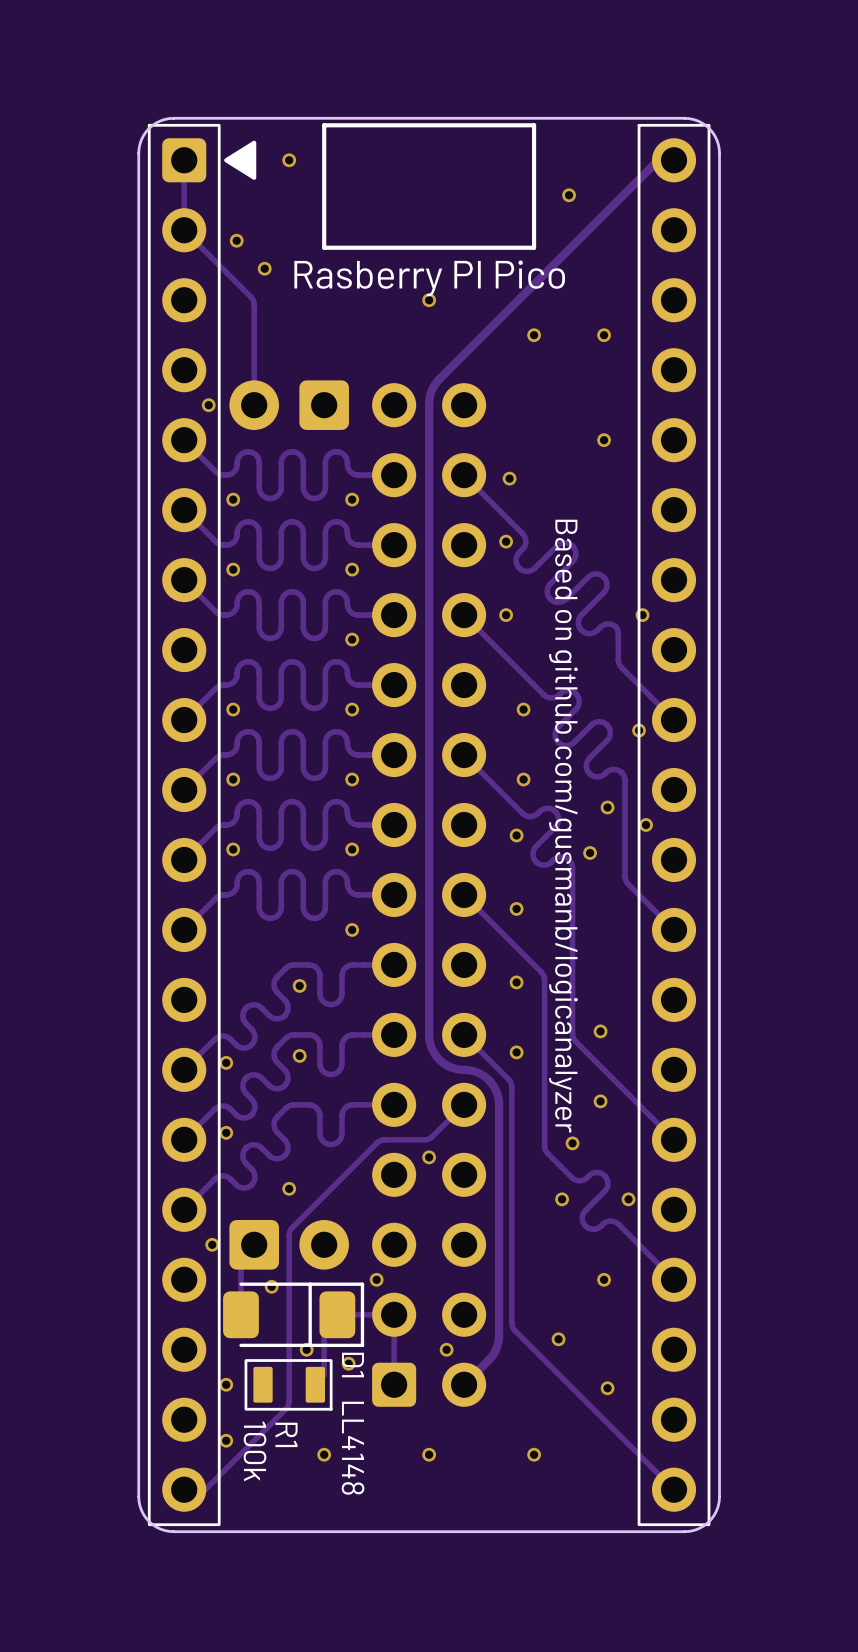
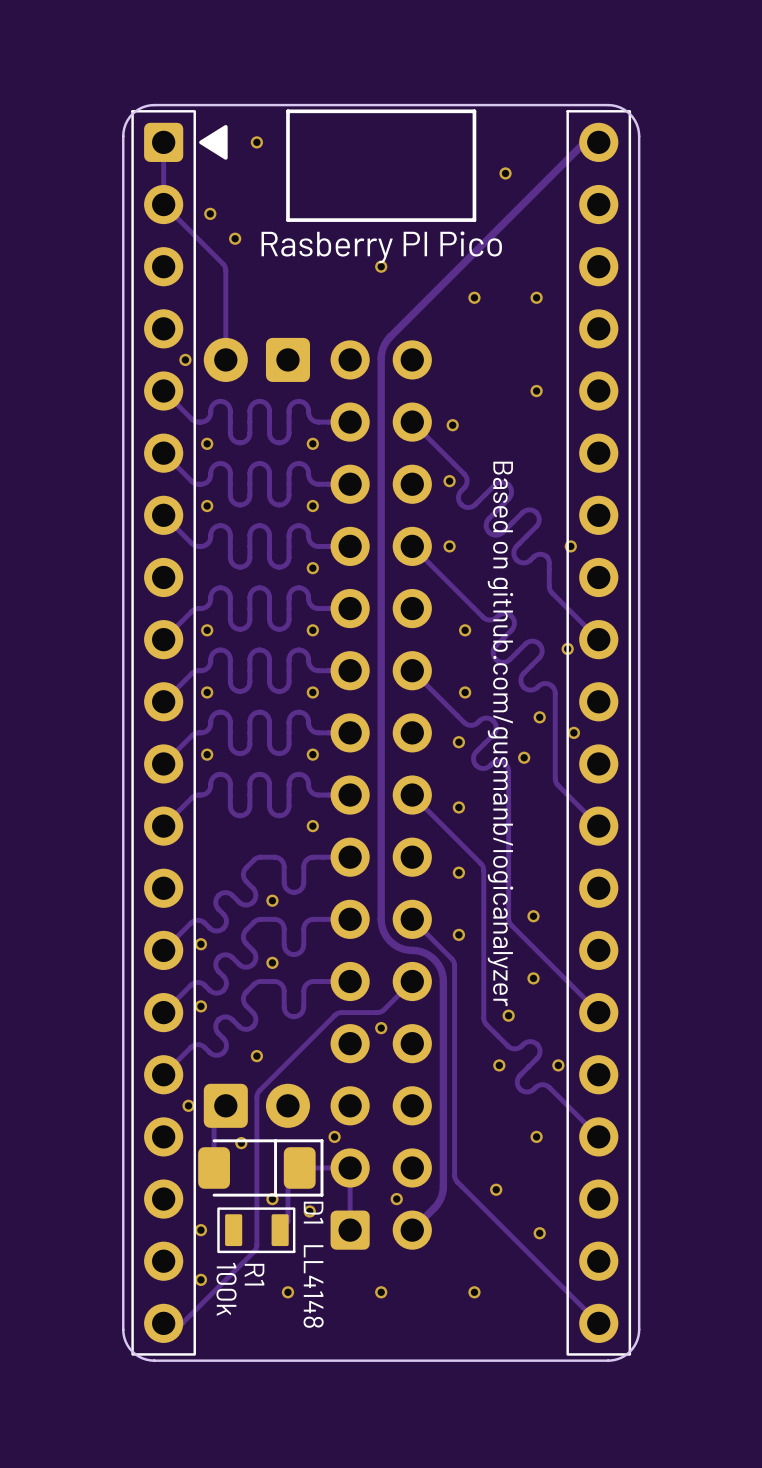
via: (299, 985) -> none
via: none -> (272, 900)
via: (299, 1055) -> none
via: none -> (272, 962)

